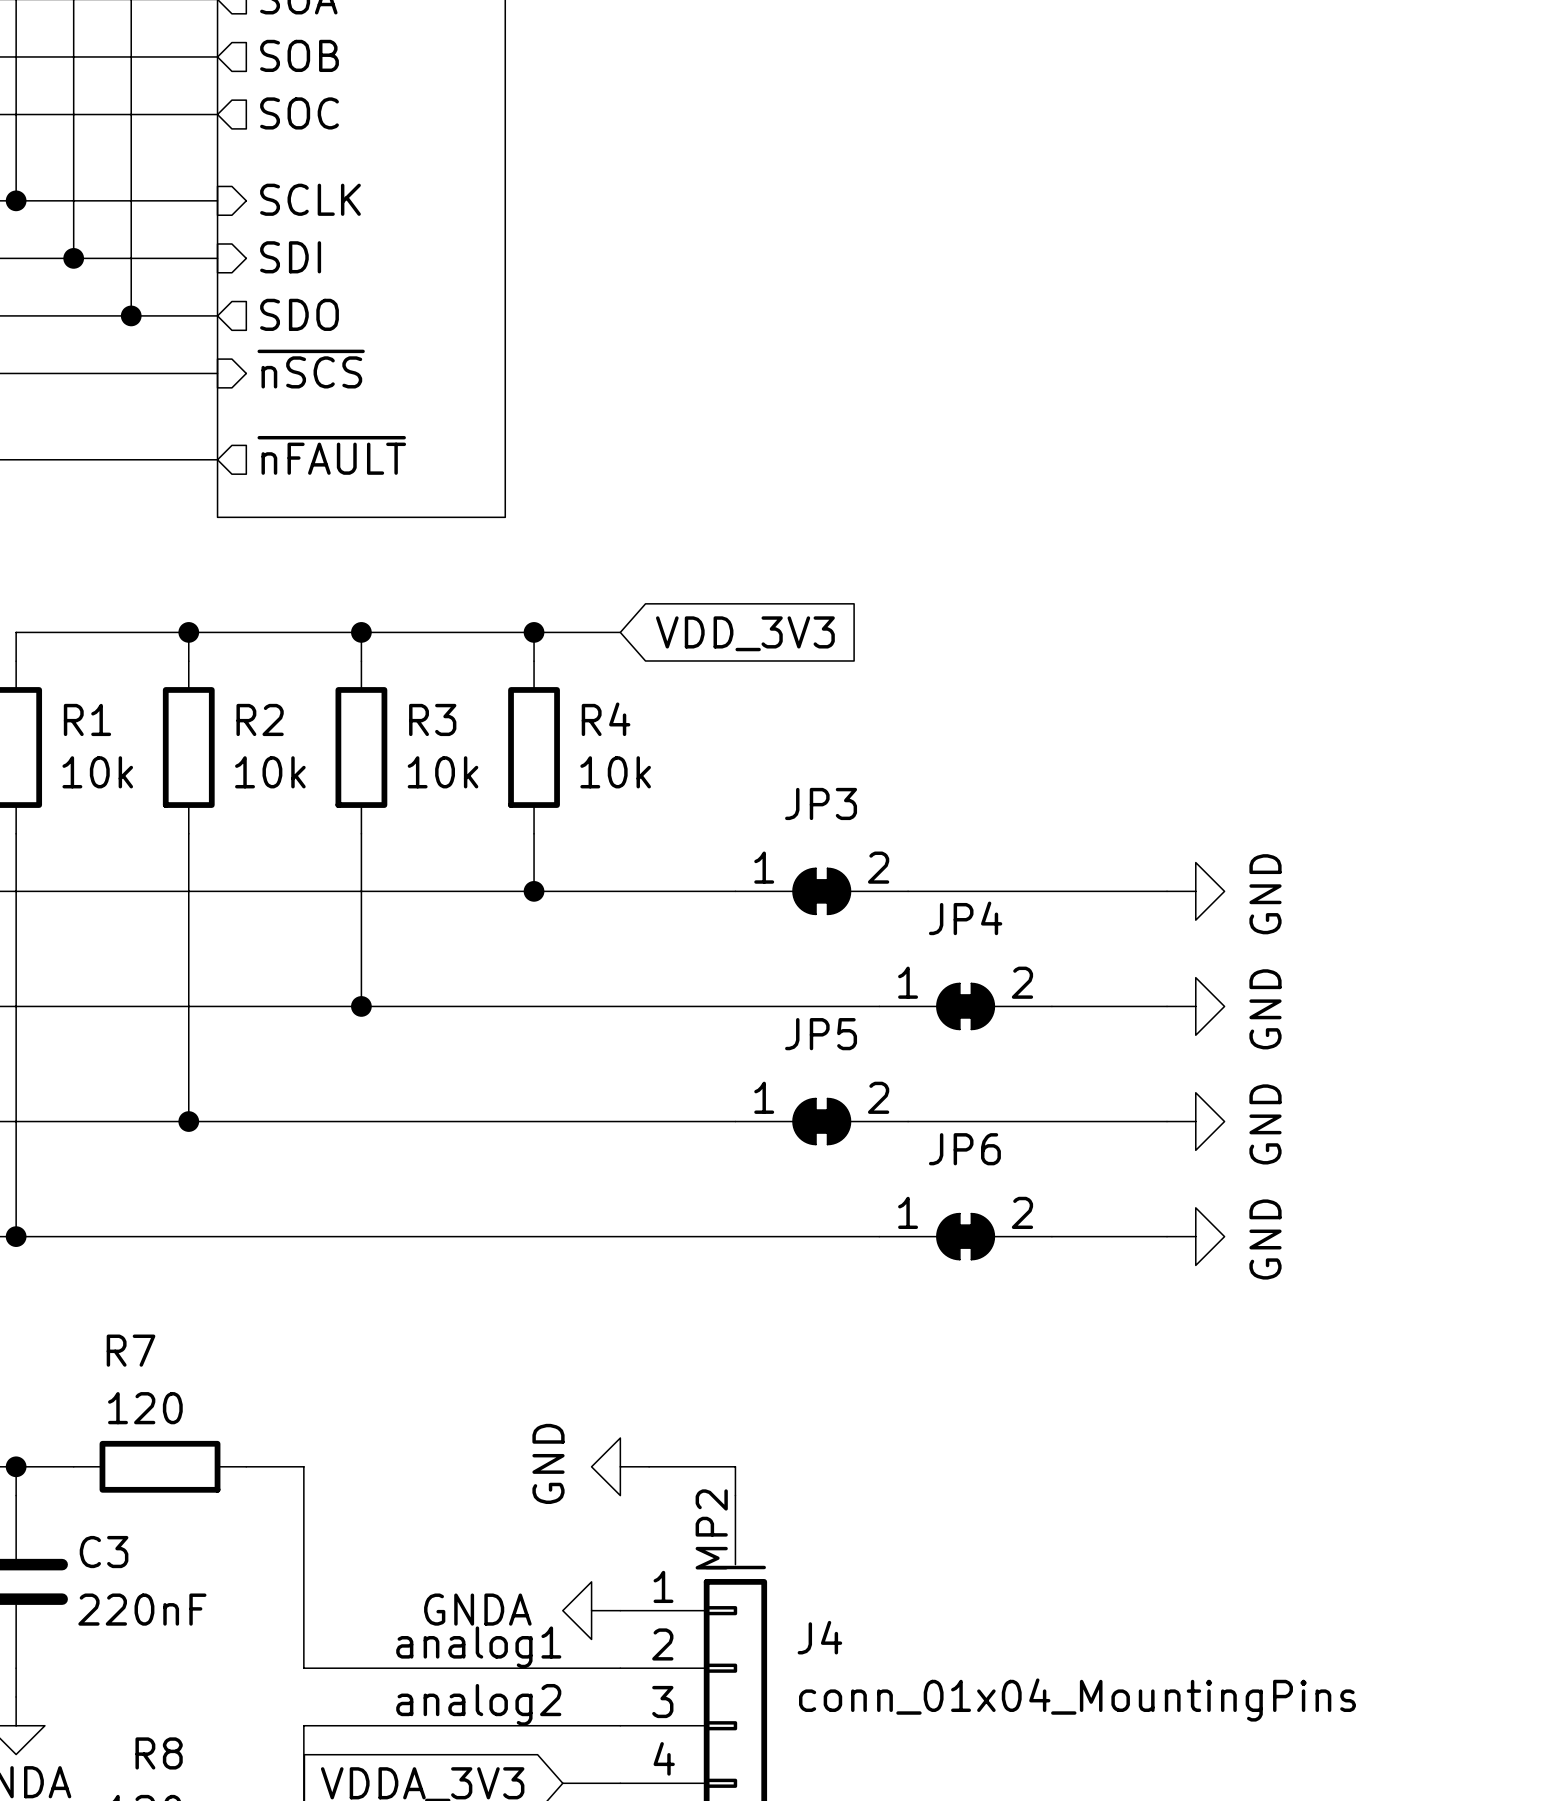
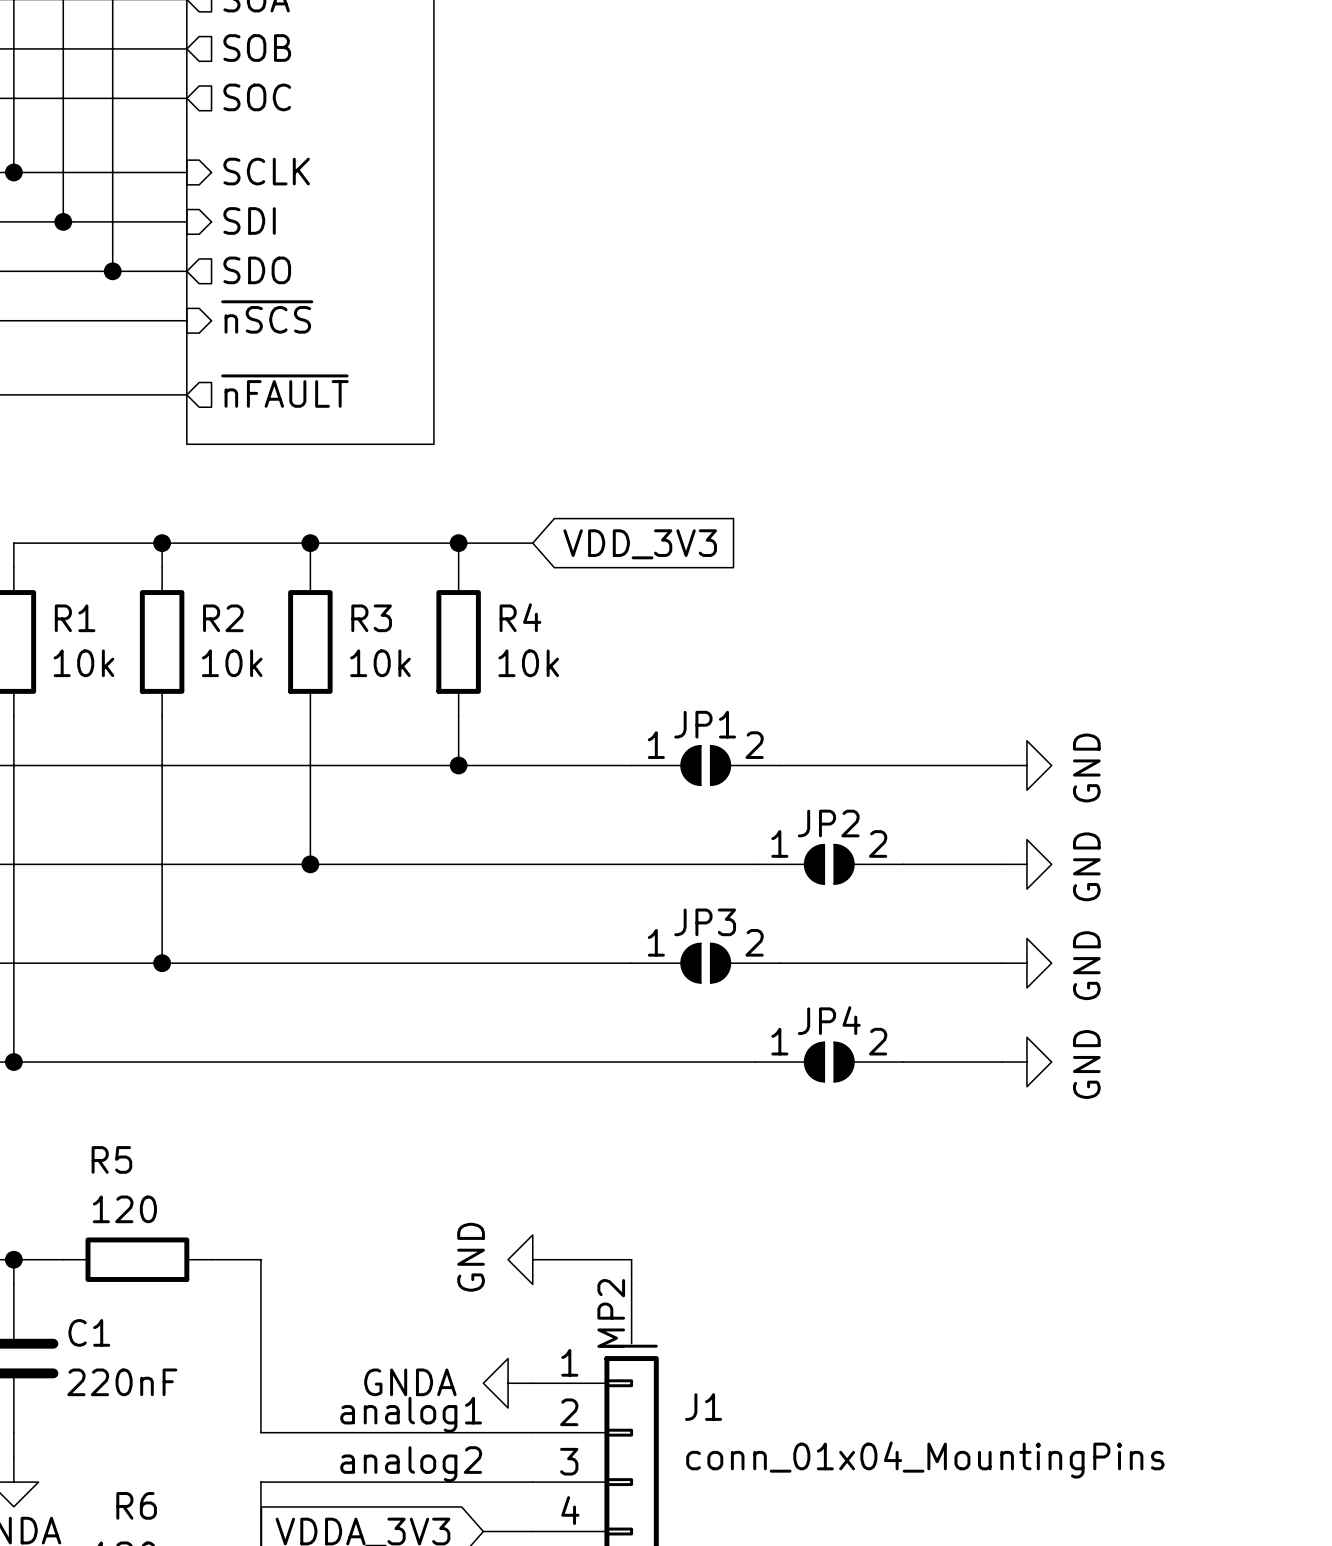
JP3 symbol: [735, 868, 909, 915] -> [631, 943, 780, 983]
JP1: none -> (705, 765)
JP4 symbol: [879, 983, 1052, 1030] -> [755, 1042, 904, 1082]
JP2: none -> (829, 864)
JP5: (821, 1121) -> none
JP6: (965, 1236) -> none
R7 name: R7 (131, 1350) -> R5 (111, 1159)
C3 name: C3 (104, 1552) -> C1 (89, 1332)
J4 name: J4 (819, 1637) -> J1 (703, 1407)
R8 name: R8 (159, 1753) -> R6 (136, 1505)

